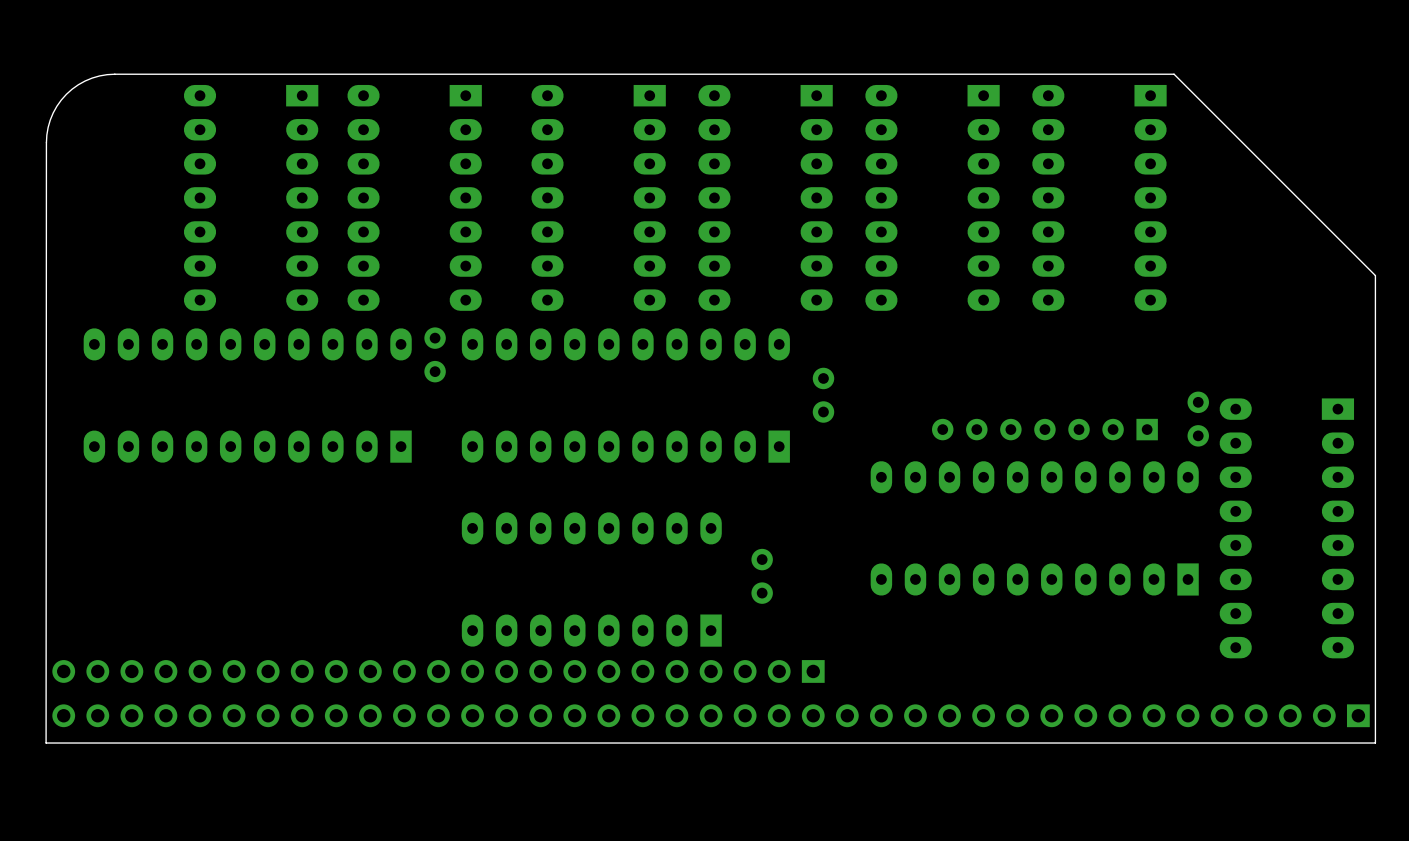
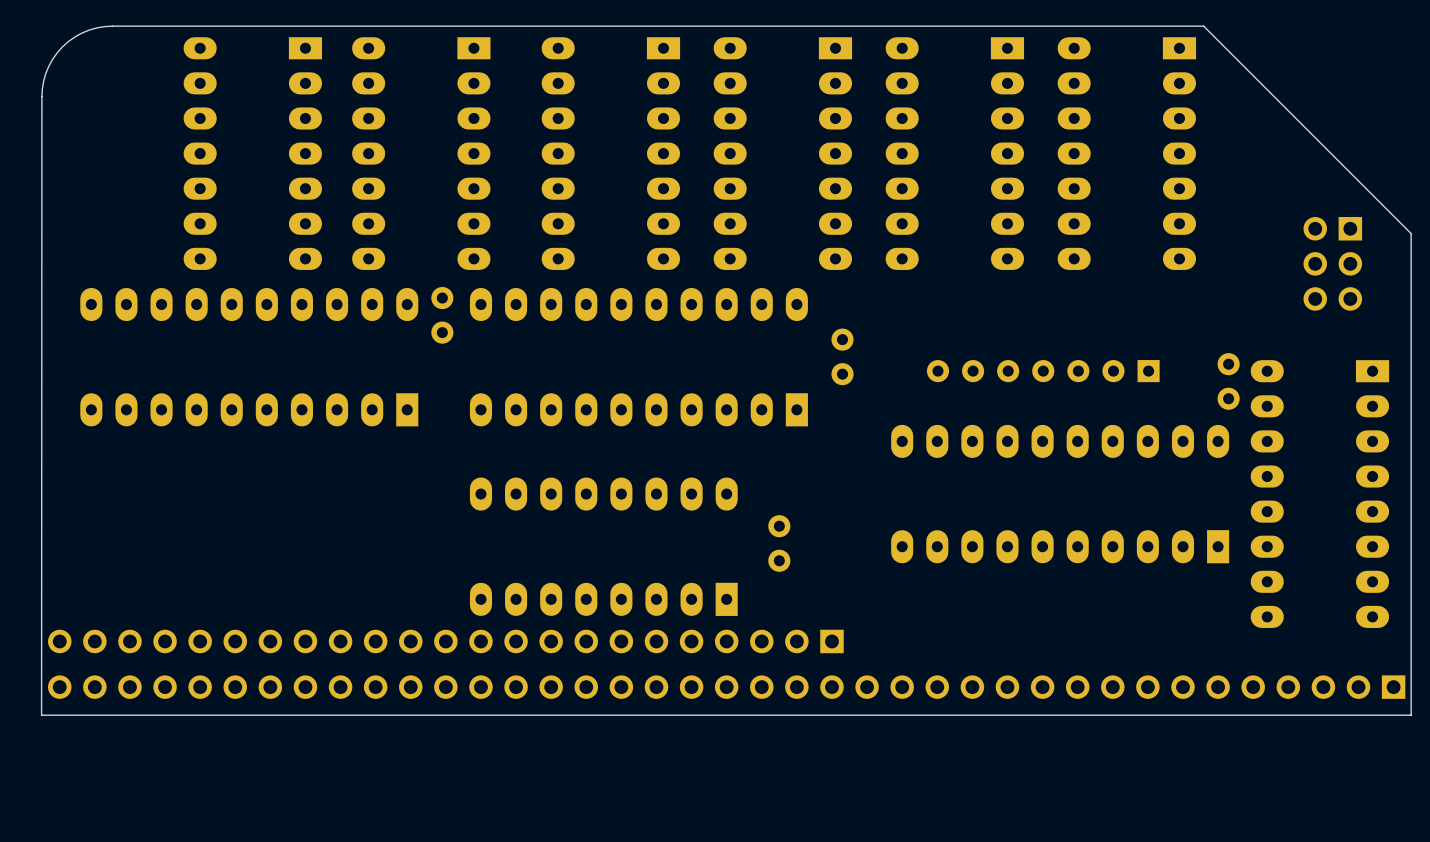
part: none -> (1332, 263)
part position: (1044, 429) -> (1043, 371)

